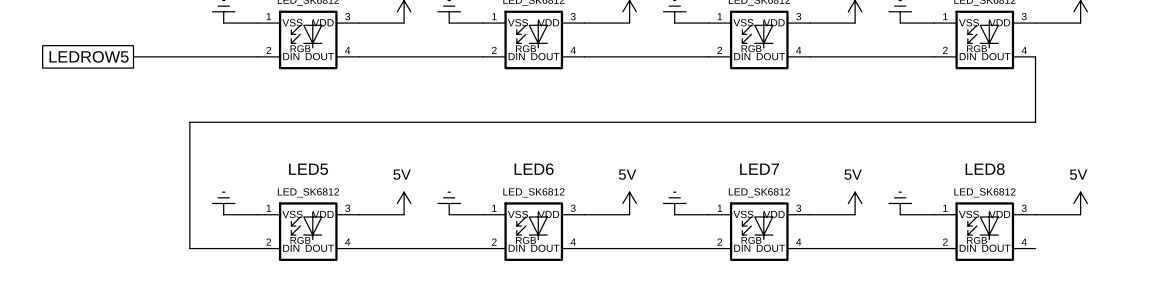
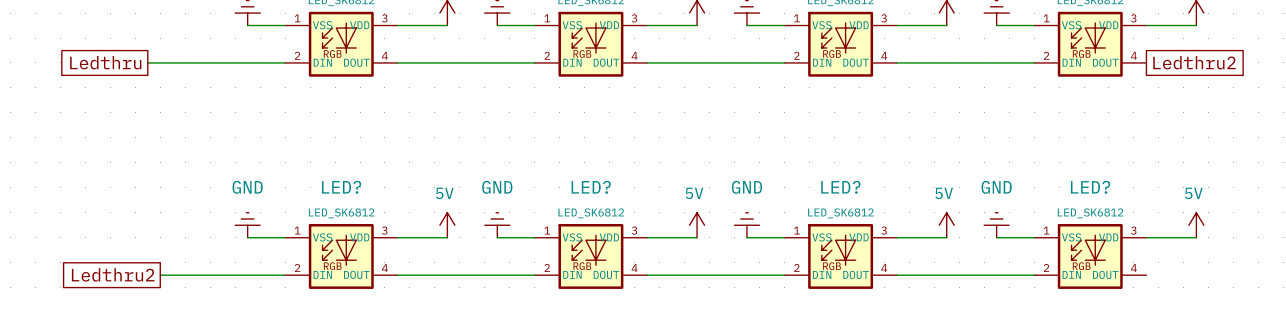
global label: LEDROW5 (89, 56) -> Ledthru (105, 62)
wire: (1035, 56) (1035, 122) (189, 122) (189, 248) -> (160, 275) (210, 275)
global label: none -> Ledthru2 (1194, 62)
power symbol text: none -> GND (247, 187)
LED5 name: LED5 (308, 169) -> LED? (341, 187)
power symbol text: none -> GND (497, 187)
LED6 name: LED6 (534, 169) -> LED? (591, 187)
power symbol text: none -> GND (746, 187)
LED7 name: LED7 (759, 169) -> LED? (840, 187)
power symbol text: none -> GND (996, 187)
LED8 name: LED8 (985, 169) -> LED? (1090, 187)
global label: none -> Ledthru2 (113, 274)

